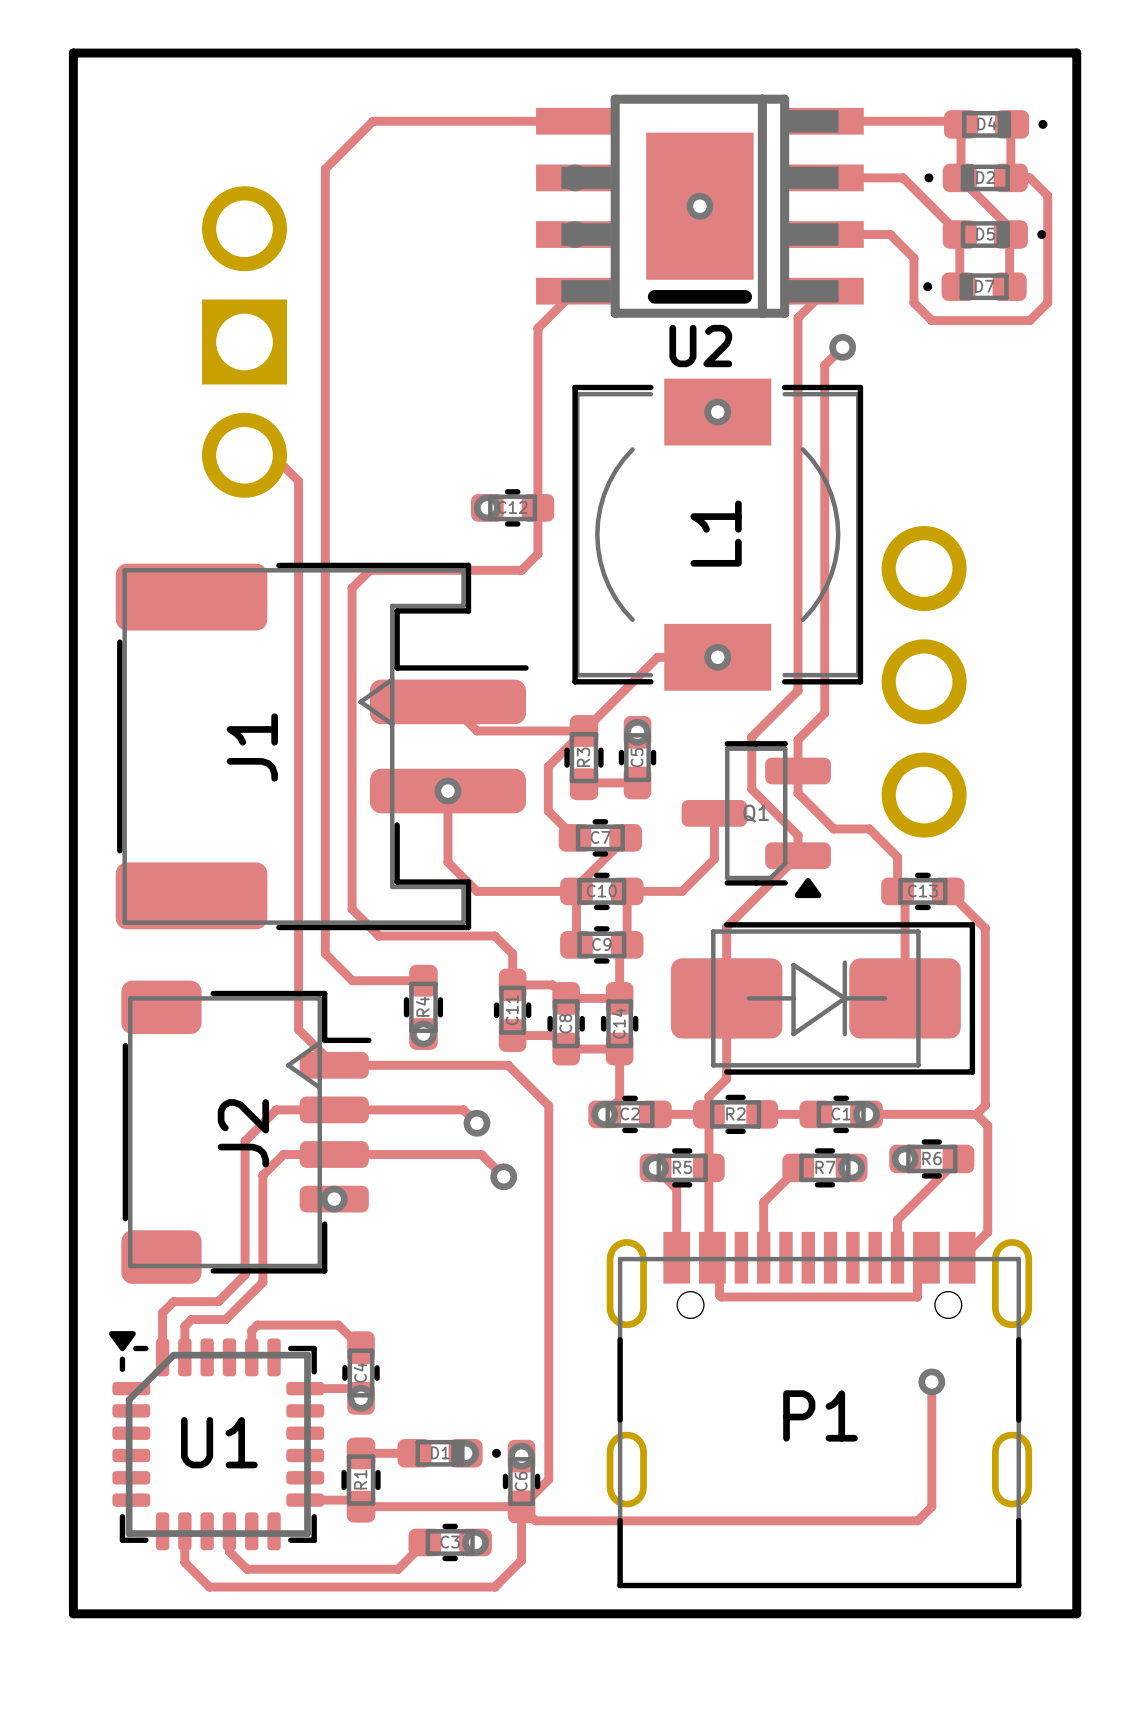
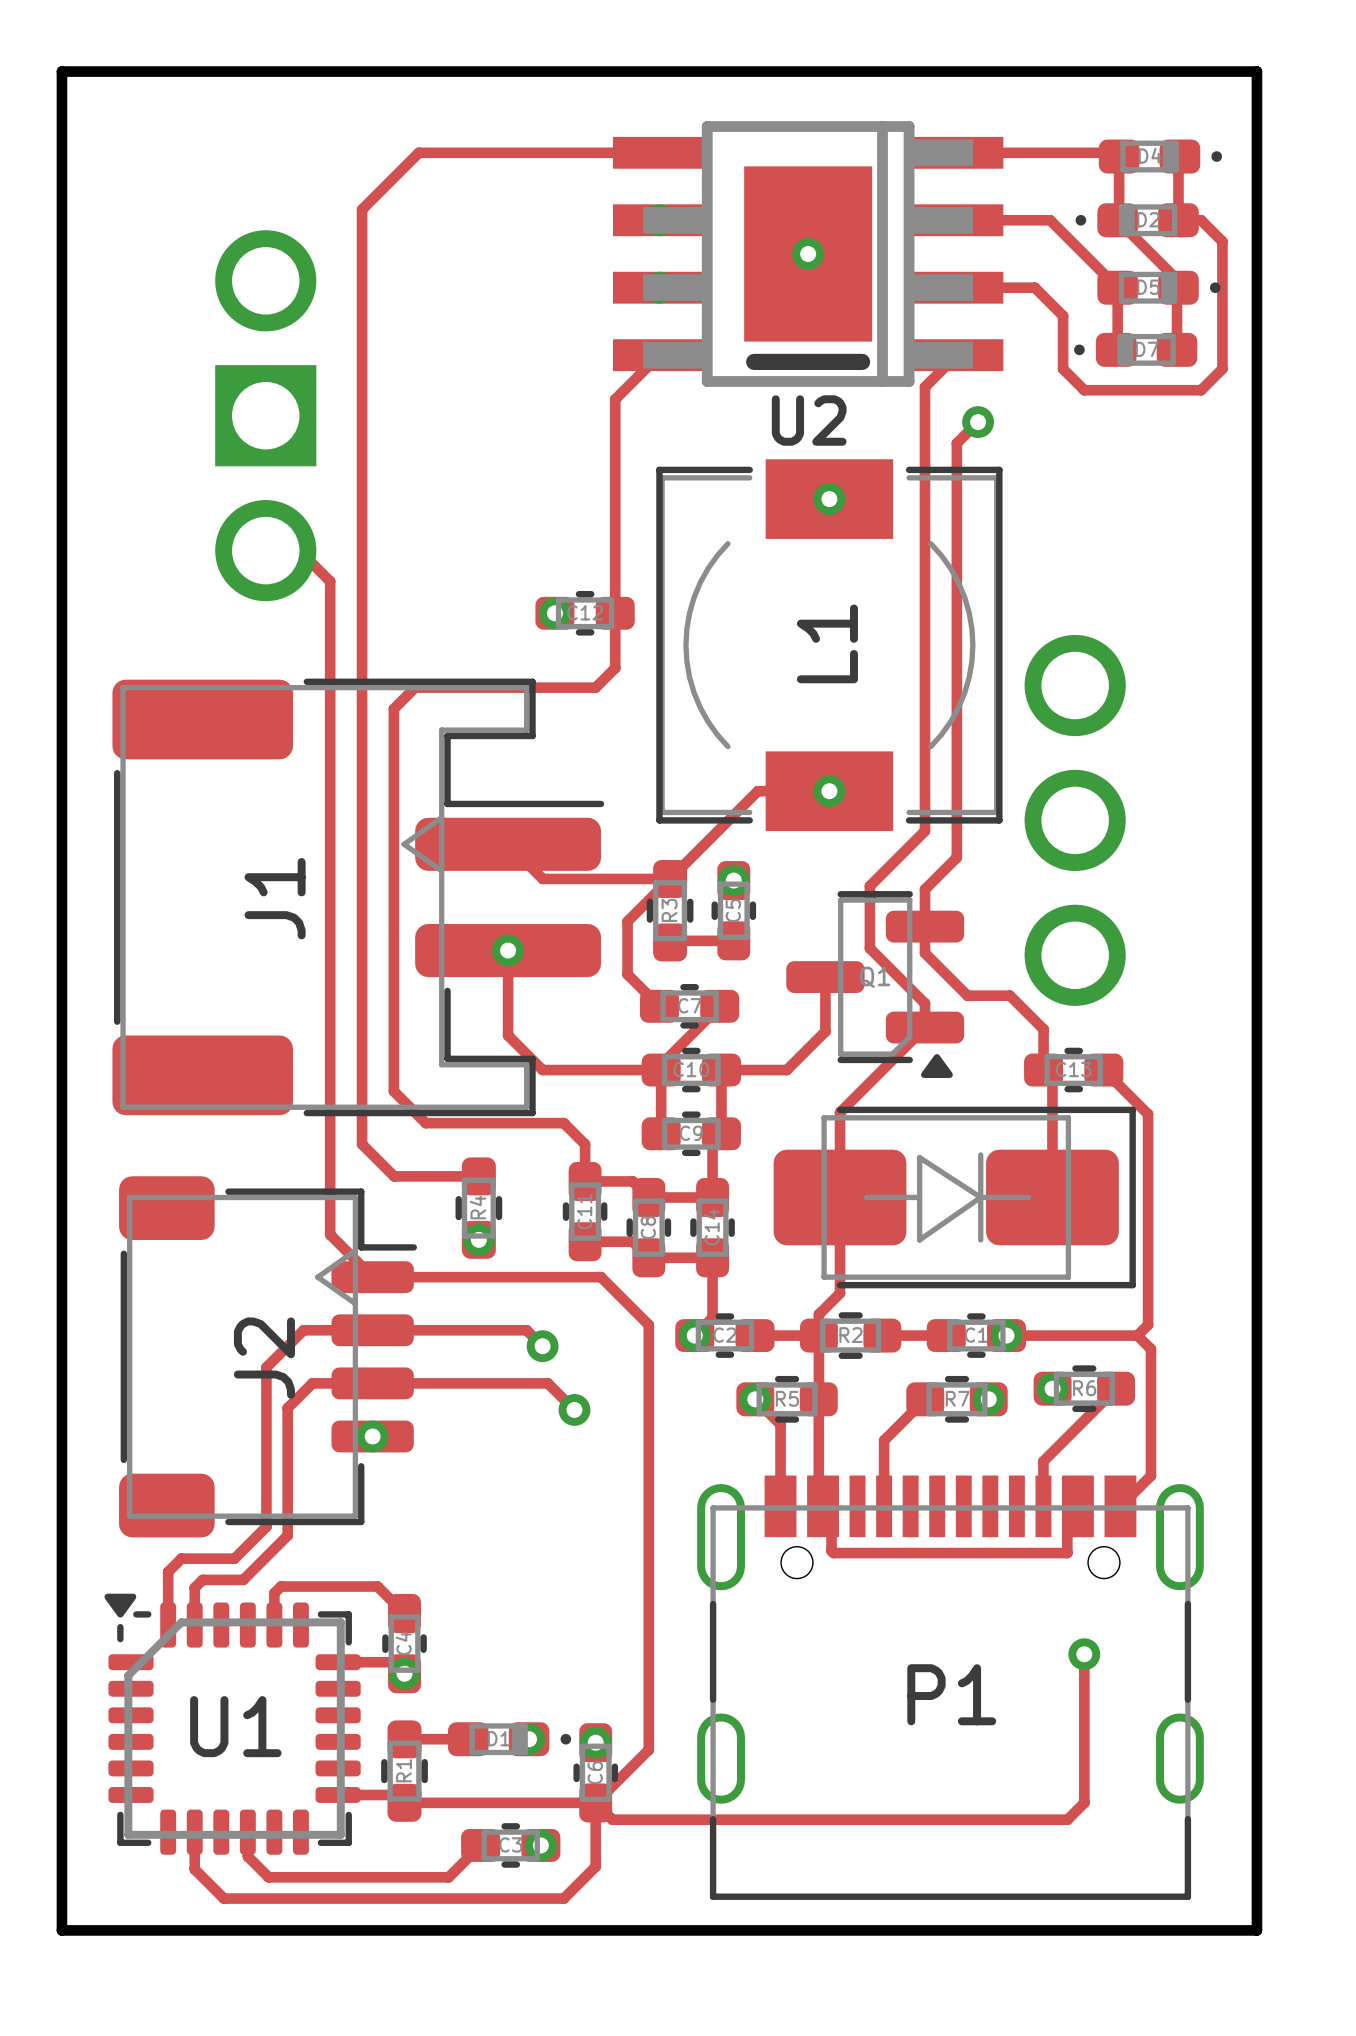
track: (508, 1065) (548, 1105) (548, 1479) -> (579, 1277) (601, 1277) (648, 1324) (648, 1749) (628, 1770)

